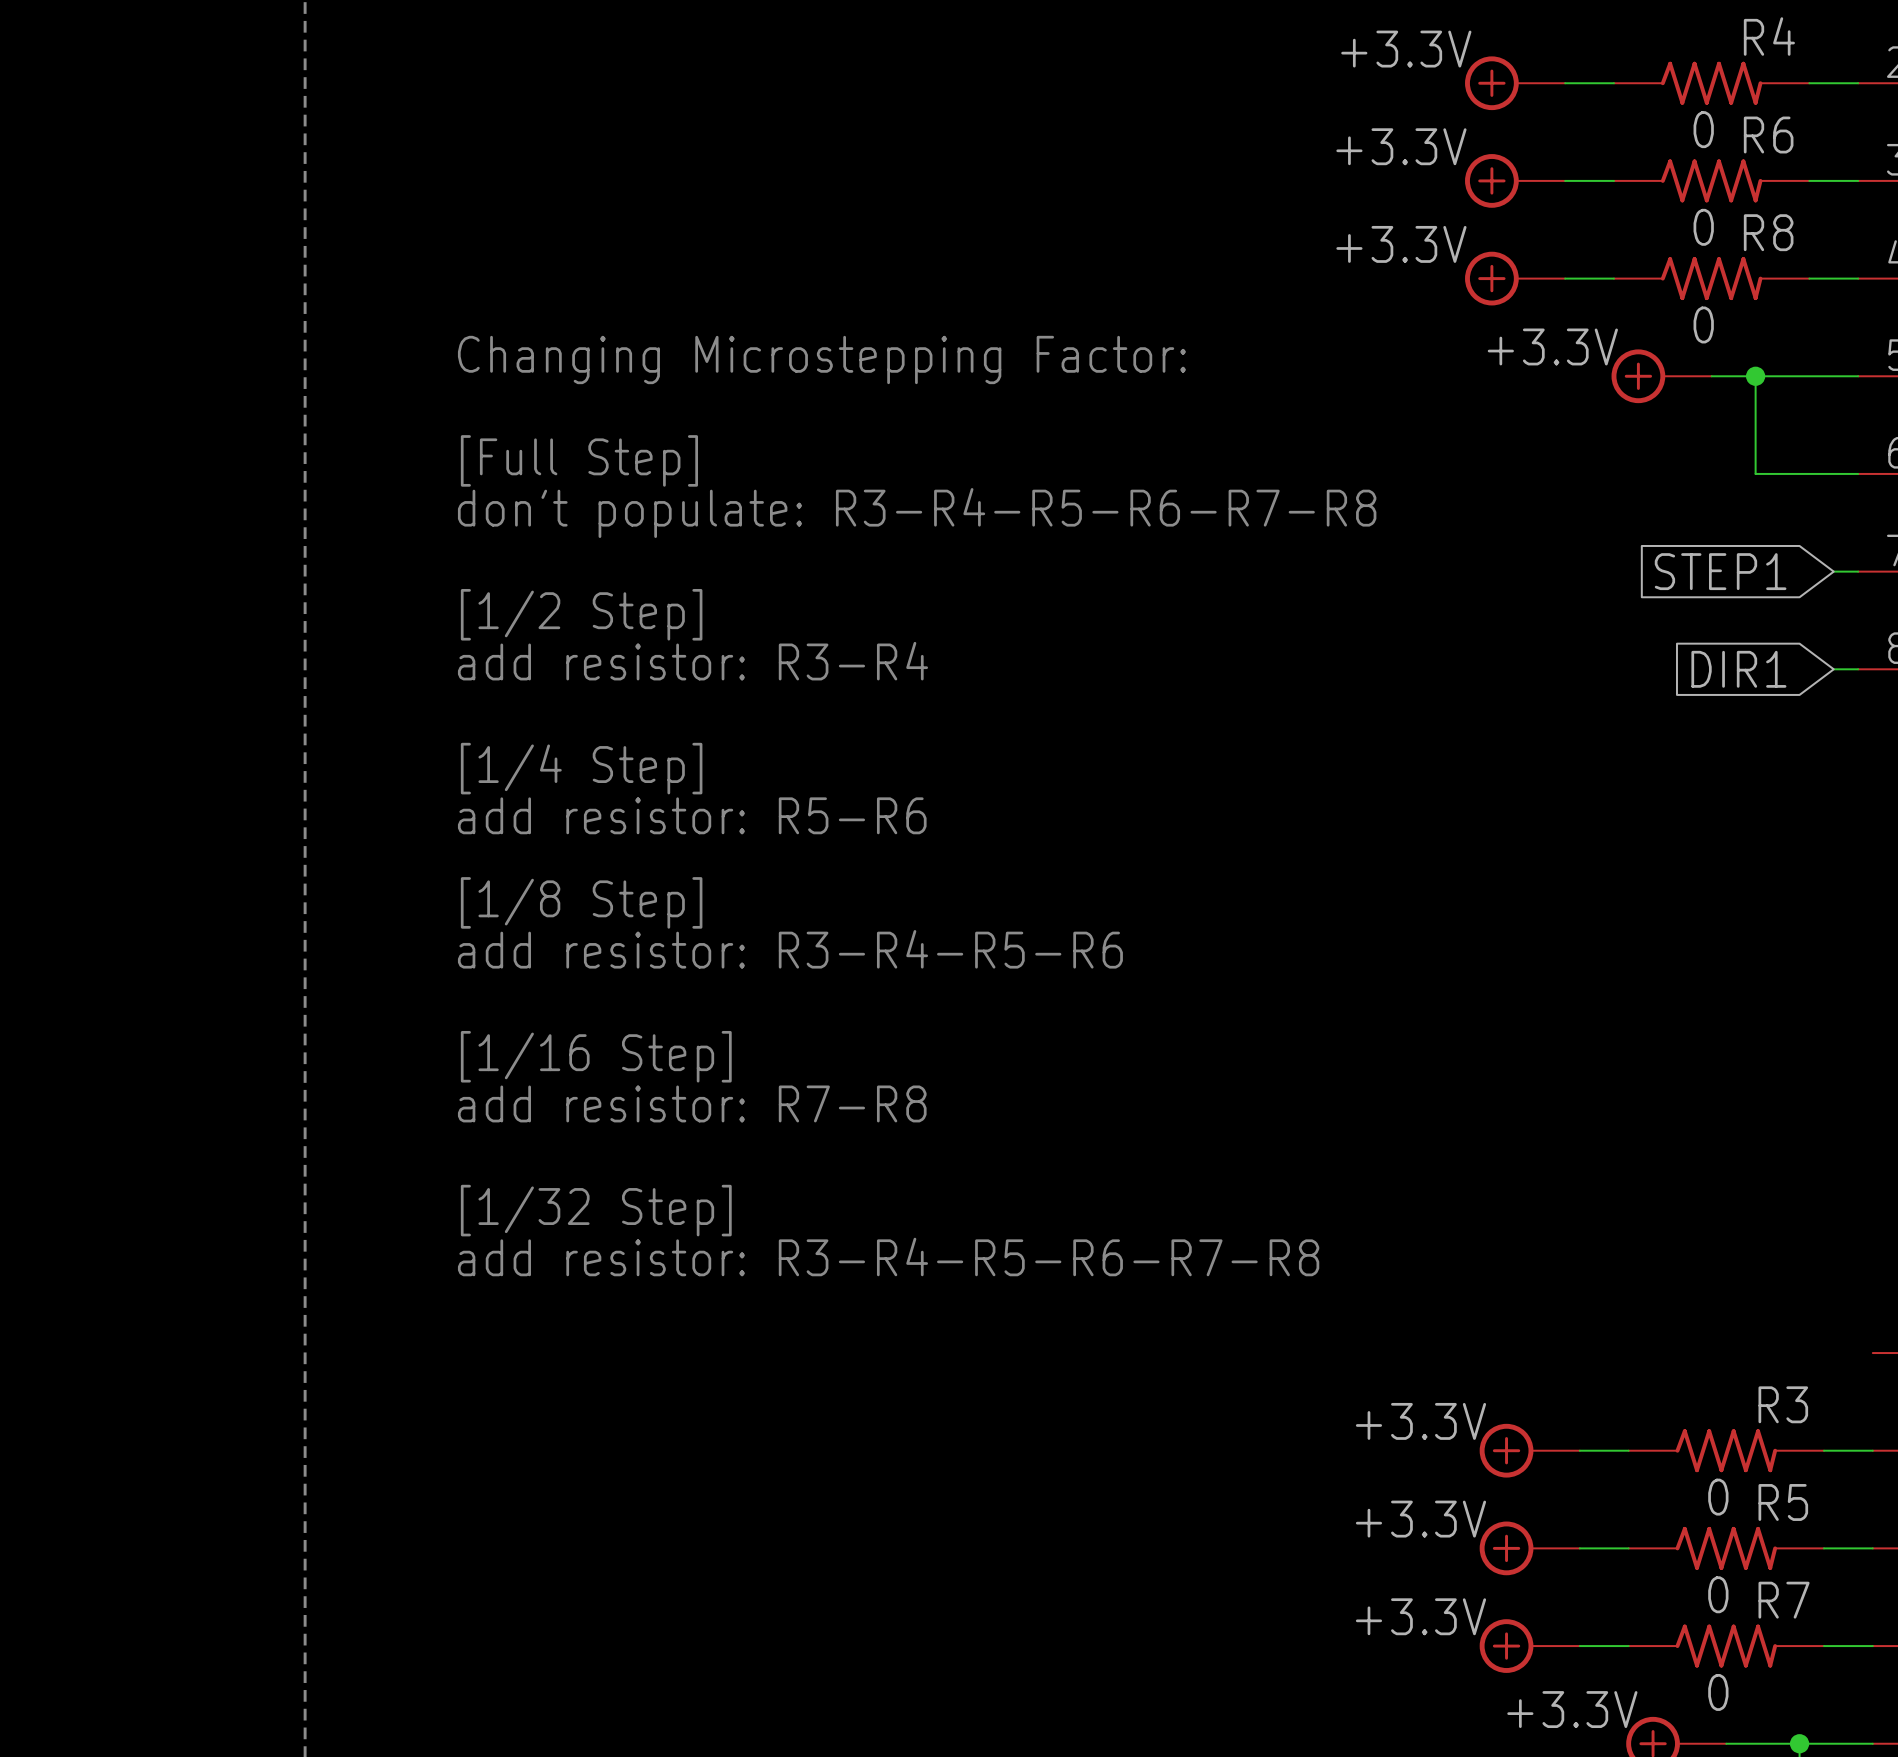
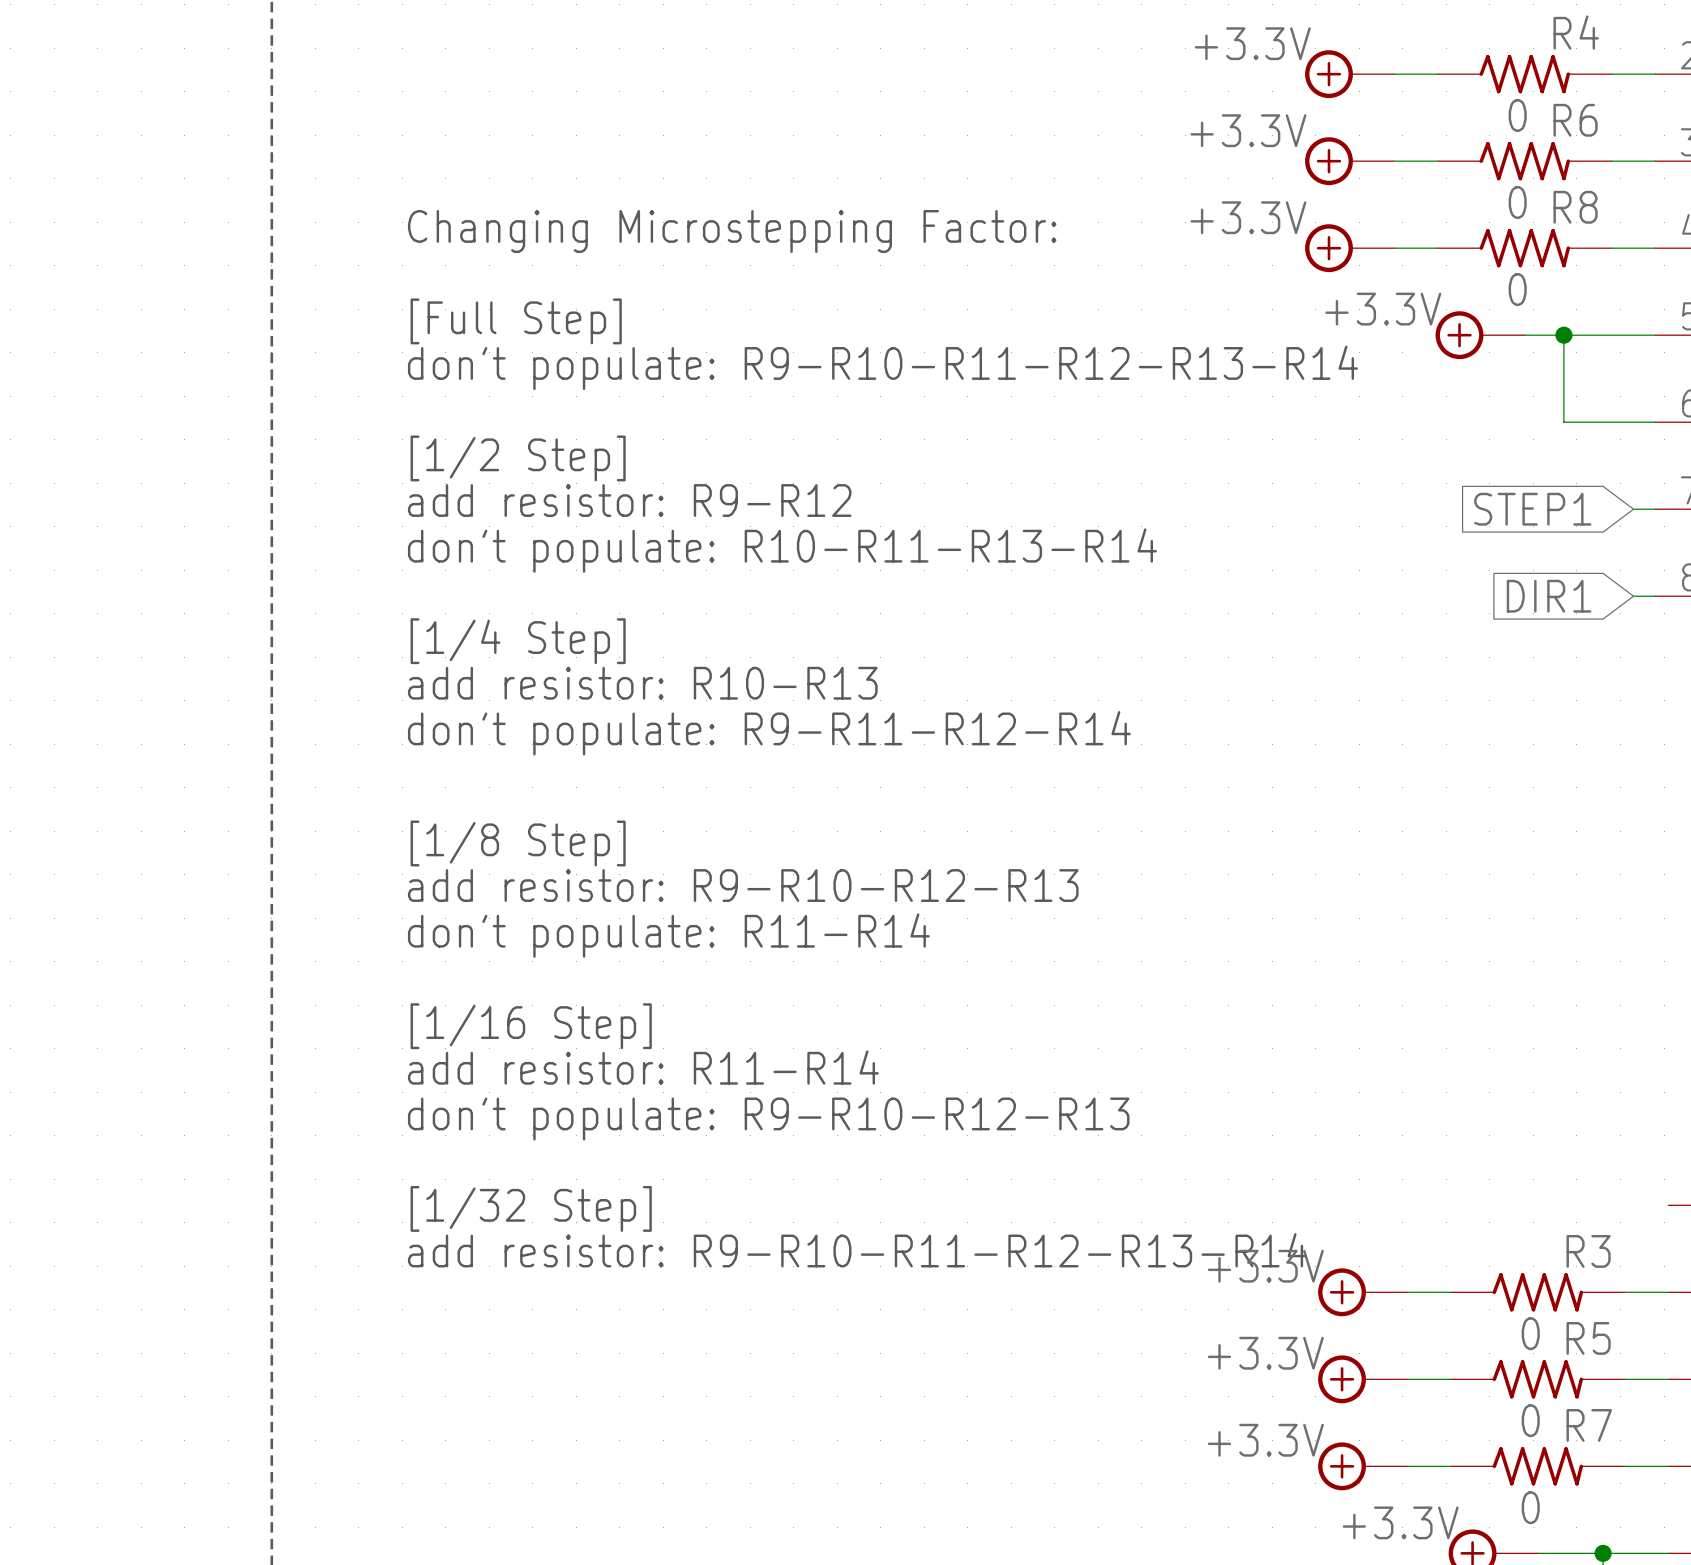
text position: Changing Microstepping Factor: (821, 359) -> Changing Microstepping Factor: (732, 231)
text: none -> don't populate: R9-R10-R11-R12-R13-R14 (882, 367)
text position: [Full Step] (579, 460) -> [Full Step] (516, 321)
text: don't populate: R3-R4-R5-R6-R7-R8 (917, 513) -> none
text: none -> add resistor: R9-R12 (629, 500)
text position: [1/2 Step] (581, 614) -> [1/2 Step] (518, 458)
text: none -> don't populate: R10-R11-R13-R14 (782, 550)
text: add resistor: R3-R4 (692, 661) -> none
text: none -> add resistor: R10-R13 (642, 683)
text position: [1/4 Step] (581, 768) -> [1/4 Step] (518, 641)
text: add resistor: R5-R6 (692, 815) -> don't populate: R9-R11-R12-R14 (769, 733)
text position: [1/8 Step] (581, 902) -> [1/8 Step] (518, 843)
text: add resistor: R3-R4-R5-R6 (790, 949) -> add resistor: R9-R10-R12-R13 (743, 885)
text: none -> don't populate: R11-R14 (668, 935)
text position: [1/16 Step] (596, 1056) -> [1/16 Step] (531, 1026)
text: add resistor: R7-R8 (692, 1103) -> none
text: none -> add resistor: R11-R14 (643, 1067)
text position: [1/32 Step] (596, 1210) -> [1/32 Step] (531, 1208)
text: add resistor: R3-R4-R5-R6-R7-R8 (888, 1256) -> don't populate: R9-R10-R12-R13 (768, 1119)
text: none -> add resistor: R9-R10-R11-R12-R13-R14 (857, 1250)

